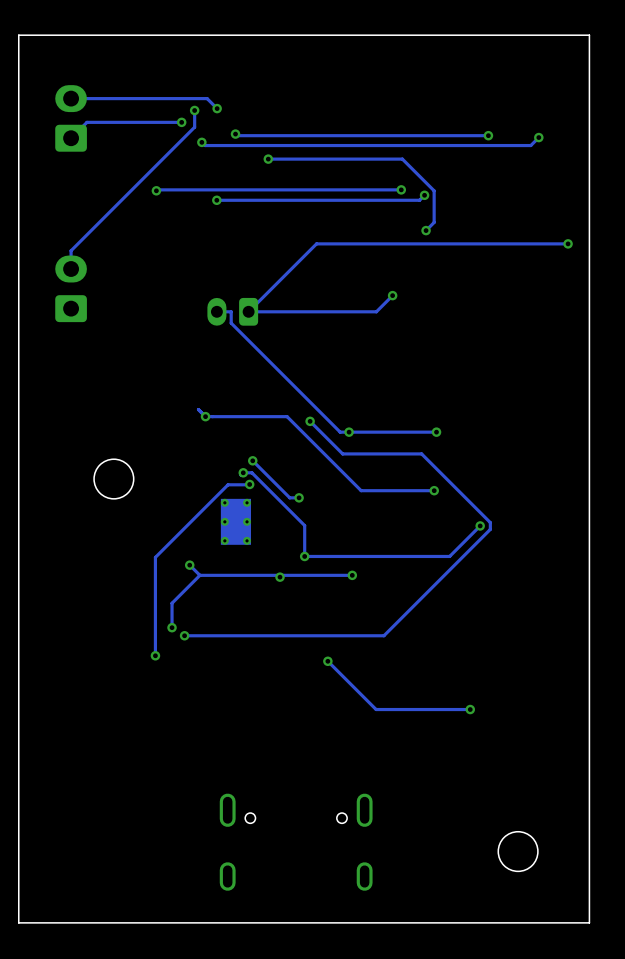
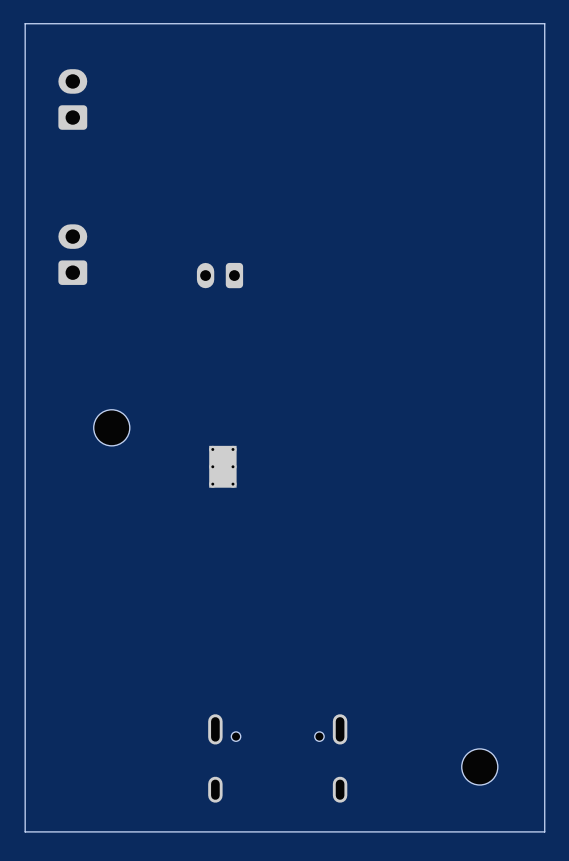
track: (71, 98) (207, 98) (217, 108) -> none
via: (217, 108) -> none
track: (194, 110) (194, 127) (71, 250) (71, 269) -> none
via: (194, 110) -> none
track: (181, 122) (86, 122) (71, 138) -> none
via: (181, 122) -> none
track: (235, 134) (237, 135) (488, 135) -> none
via: (235, 134) -> none
via: (488, 135) -> none
track: (538, 137) (530, 145) (205, 145) (201, 142) -> none
via: (538, 137) -> none
via: (201, 142) -> none
track: (268, 159) (402, 159) (434, 190) (434, 222) (426, 230) -> none
via: (268, 159) -> none
track: (401, 189) (156, 190) -> none
via: (401, 189) -> none
via: (156, 190) -> none
track: (424, 195) (419, 200) (216, 200) -> none
via: (424, 195) -> none
via: (216, 200) -> none
via: (426, 230) -> none
track: (568, 243) (316, 243) (248, 311) (376, 311) (392, 295) -> none
via: (568, 243) -> none
via: (392, 295) -> none
track: (216, 311) (231, 311) (231, 323) (340, 432) (436, 432) -> none
track: (198, 409) (205, 416) (287, 416) (361, 490) (434, 490) -> none
via: (205, 416) -> none
track: (310, 421) (342, 453) (421, 453) (490, 522) (490, 529) (383, 635) (184, 635) -> none
via: (310, 421) -> none
via: (349, 432) -> none
via: (436, 432) -> none
track: (252, 460) (289, 497) (299, 497) -> none
via: (252, 460) -> none
via: (243, 472) -> none
track: (240, 475) (243, 472) (251, 472) (304, 525) (304, 556) (449, 556) (480, 525) -> none
track: (249, 484) (228, 484) (155, 557) (155, 655) -> none
via: (249, 484) -> none
via: (434, 490) -> none
via: (299, 497) -> none
via: (480, 525) -> none
via: (304, 556) -> none
track: (189, 565) (199, 575) -> none
via: (189, 565) -> none
track: (199, 575) (172, 603) (172, 627) (169, 627) -> none
track: (352, 575) (199, 575) -> none
via: (352, 575) -> none
via: (280, 577) -> none
via: (172, 627) -> none
via: (184, 635) -> none
via: (155, 655) -> none
track: (327, 661) (376, 709) (470, 709) -> none
via: (327, 661) -> none
via: (470, 709) -> none

